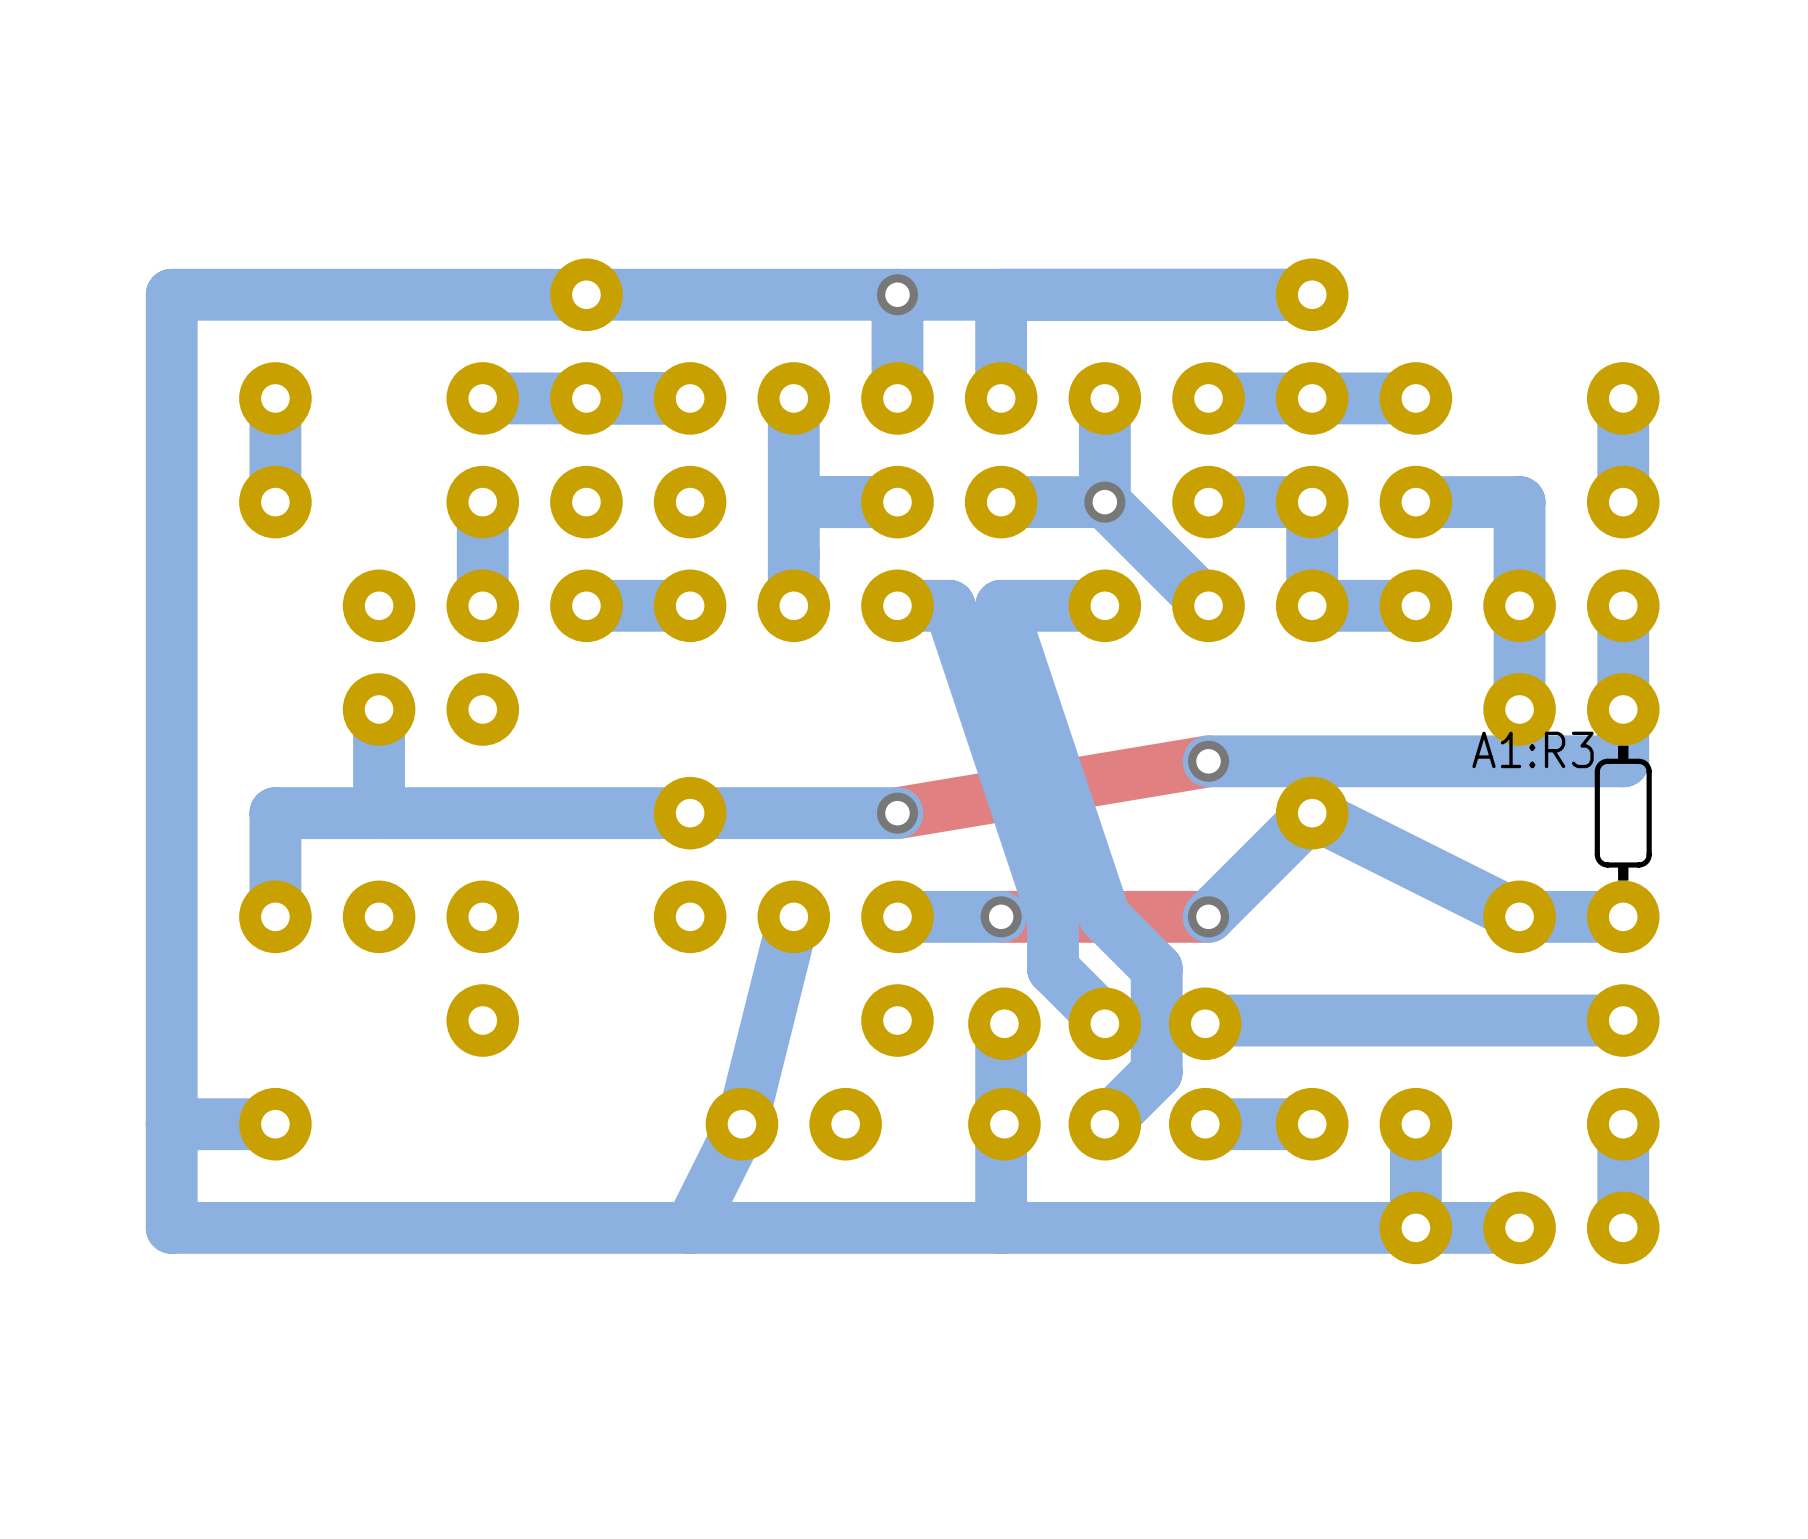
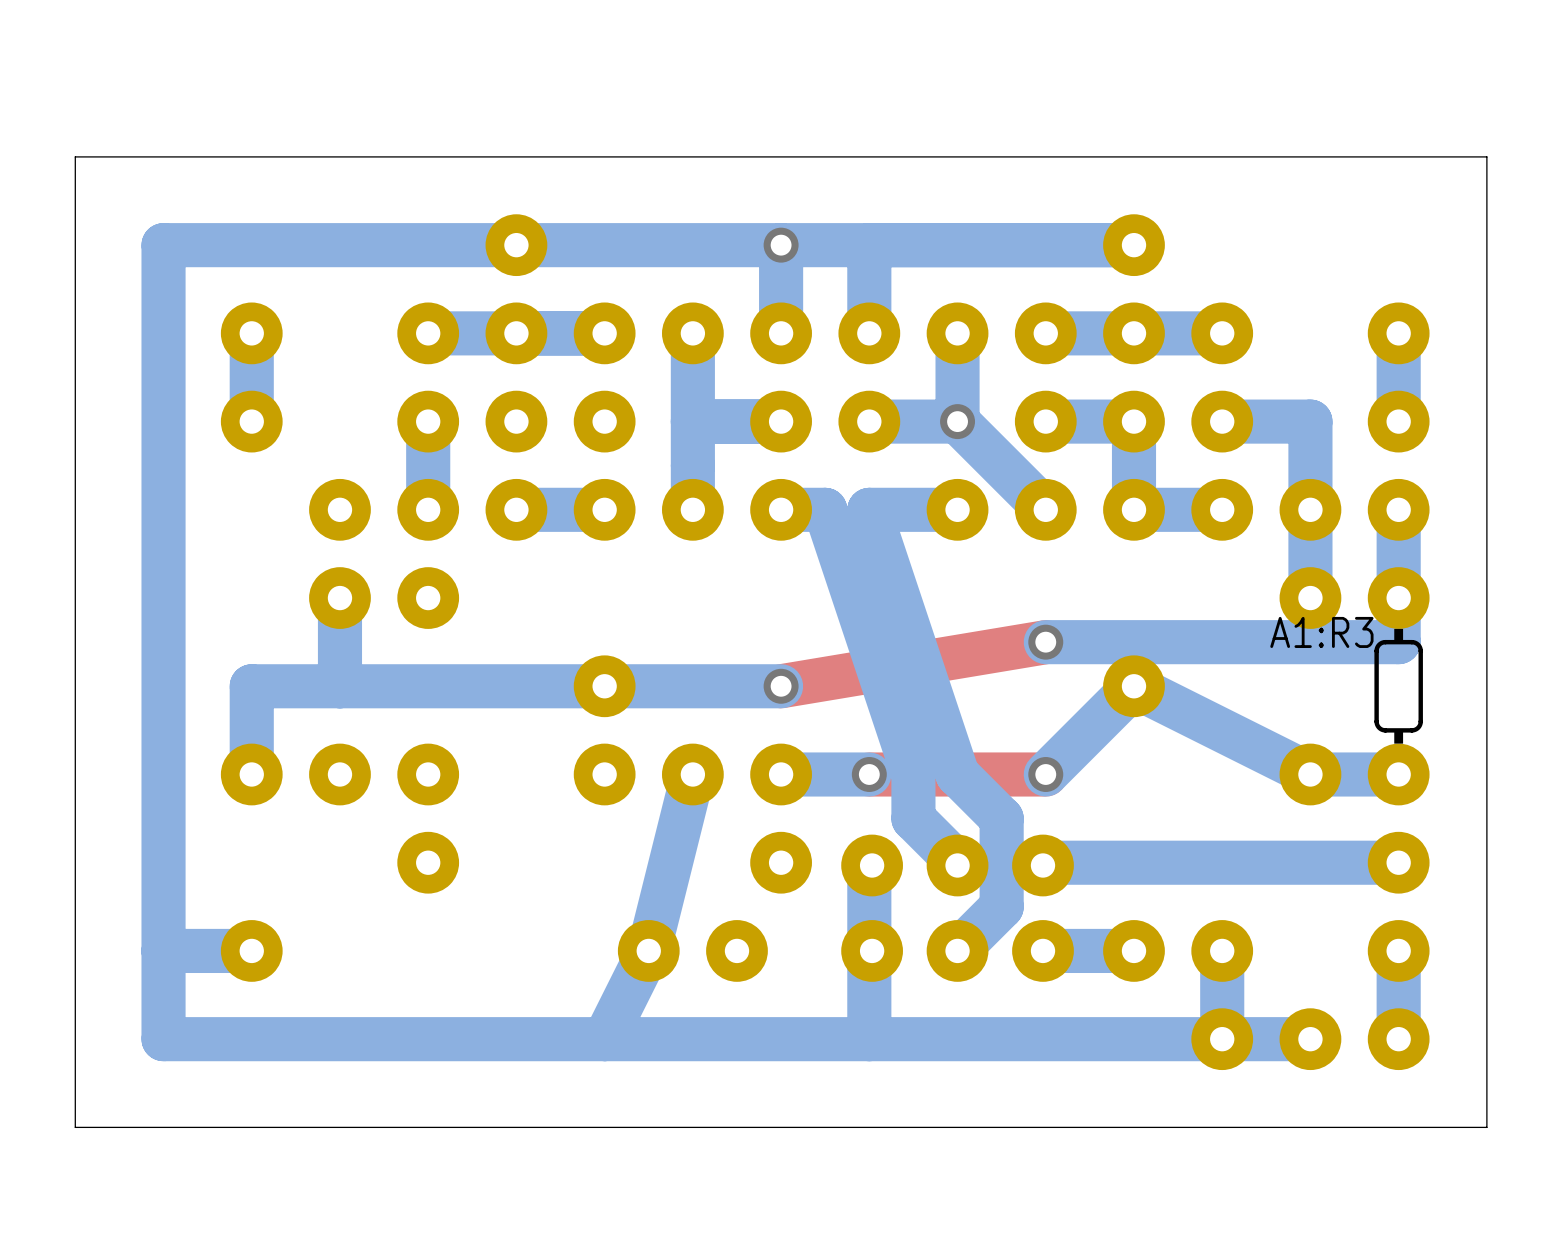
board edge: none -> (1486, 156) (75, 156) (75, 1127) (1486, 1127) (1486, 156)

